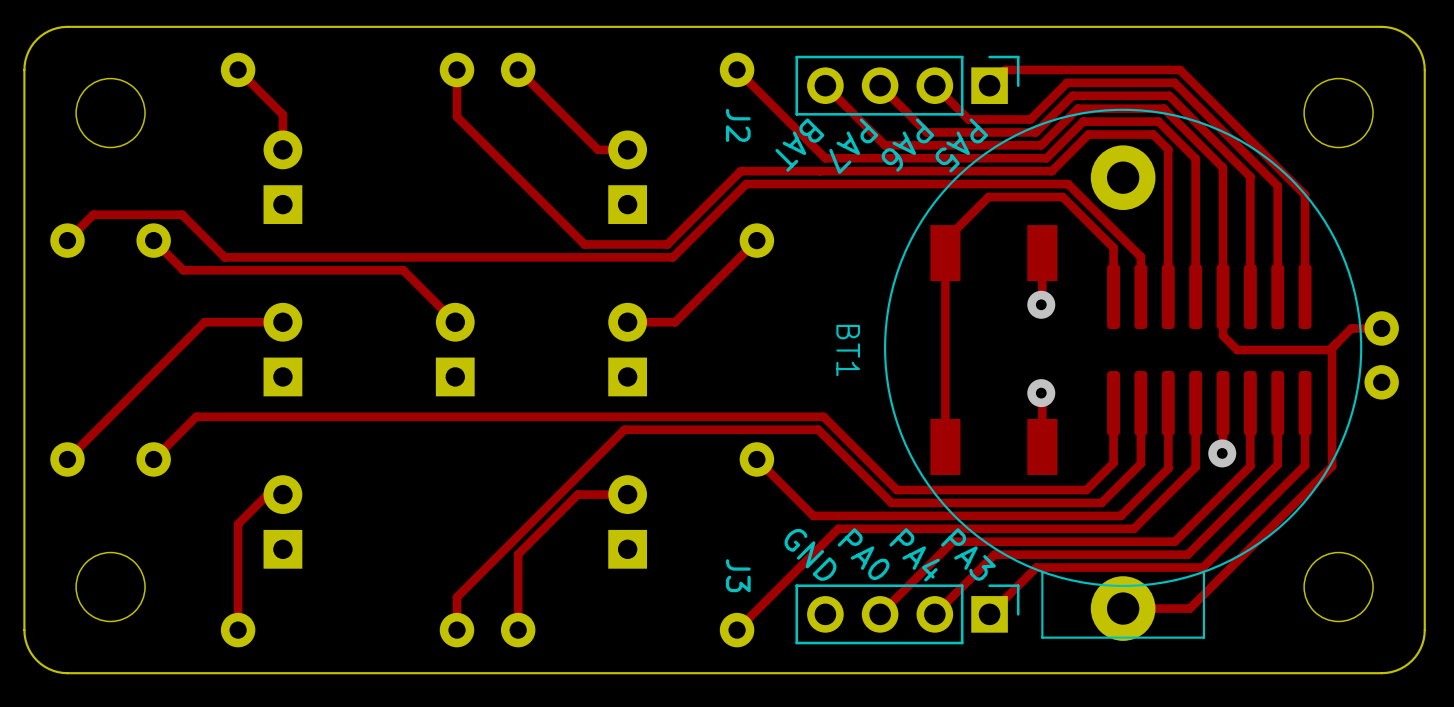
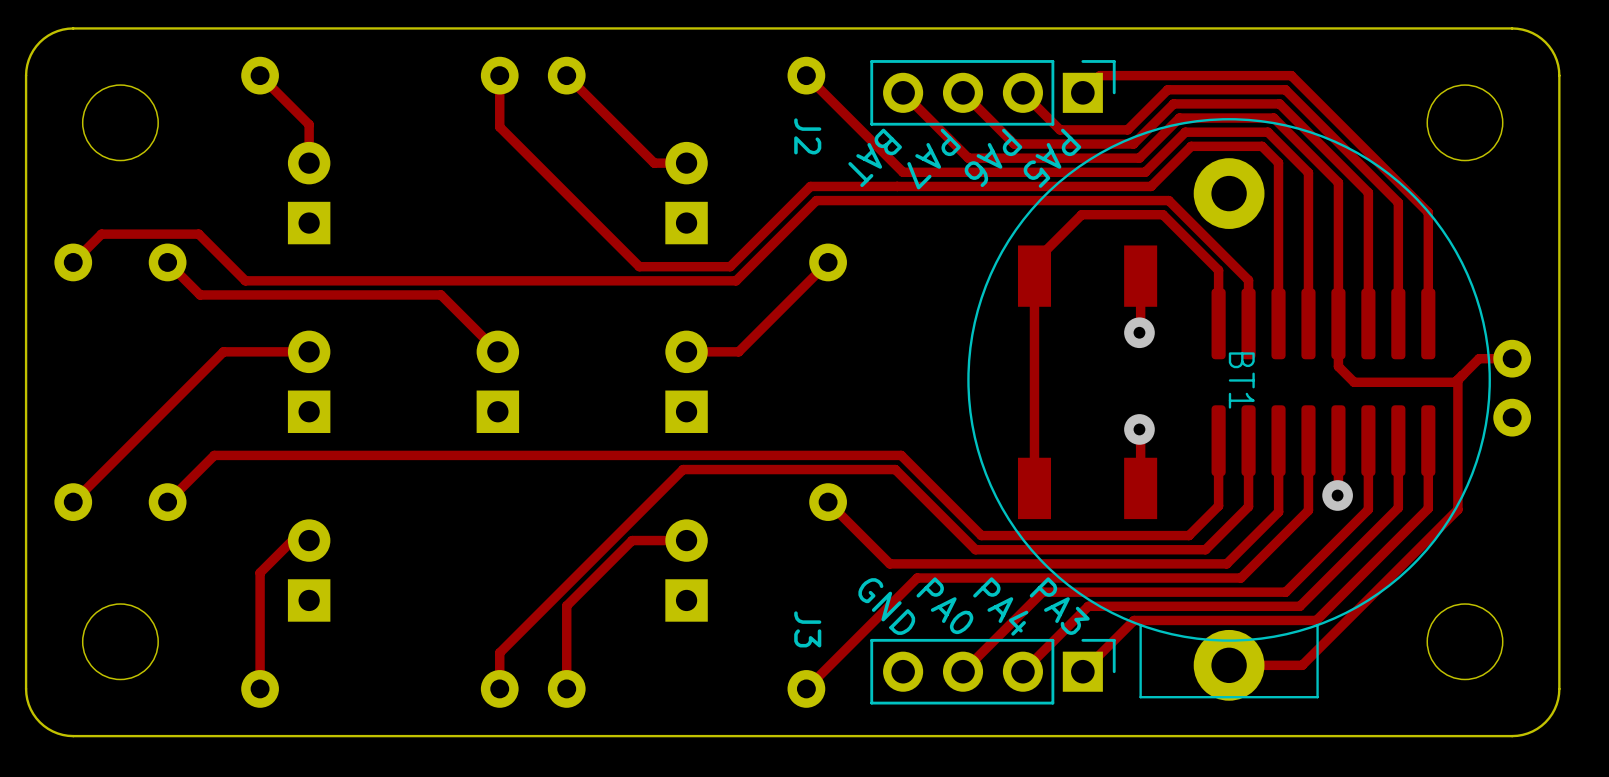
BT1 name position: BT1 (848, 350) -> BT1 (1241, 380)

